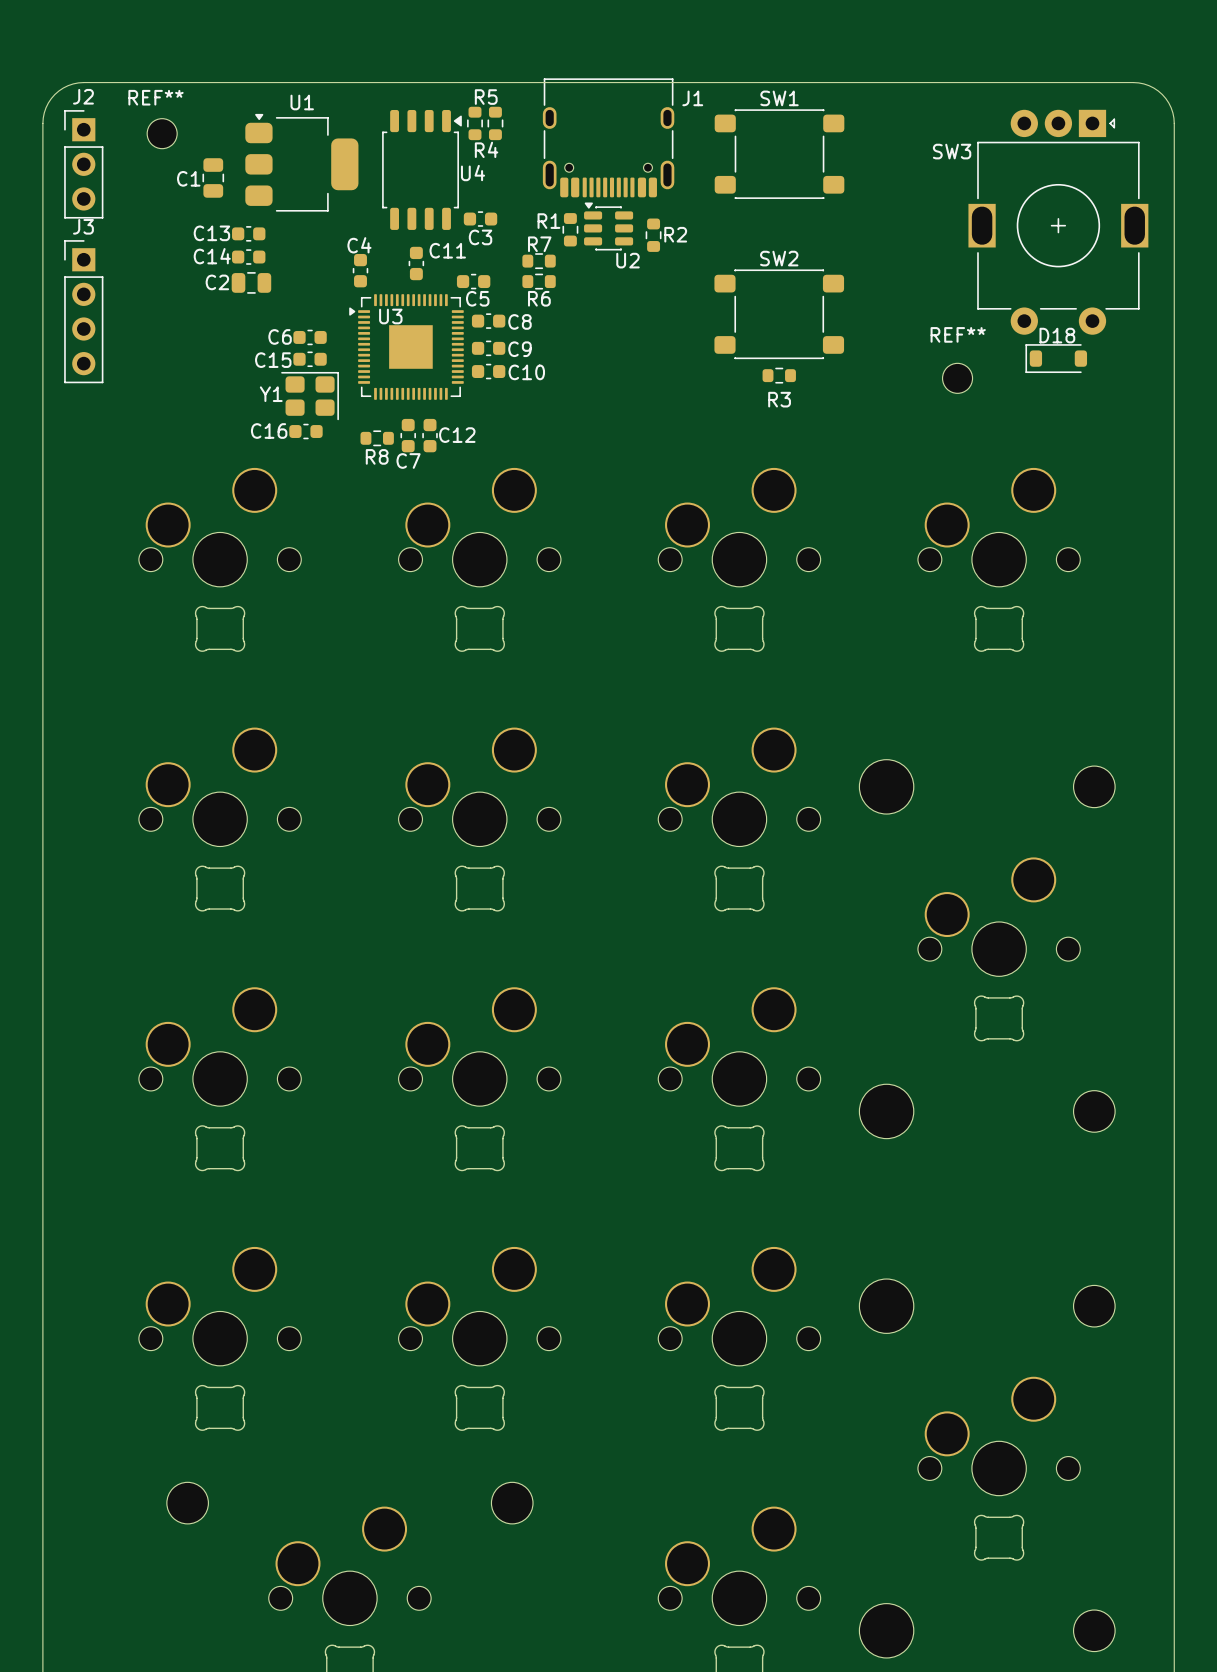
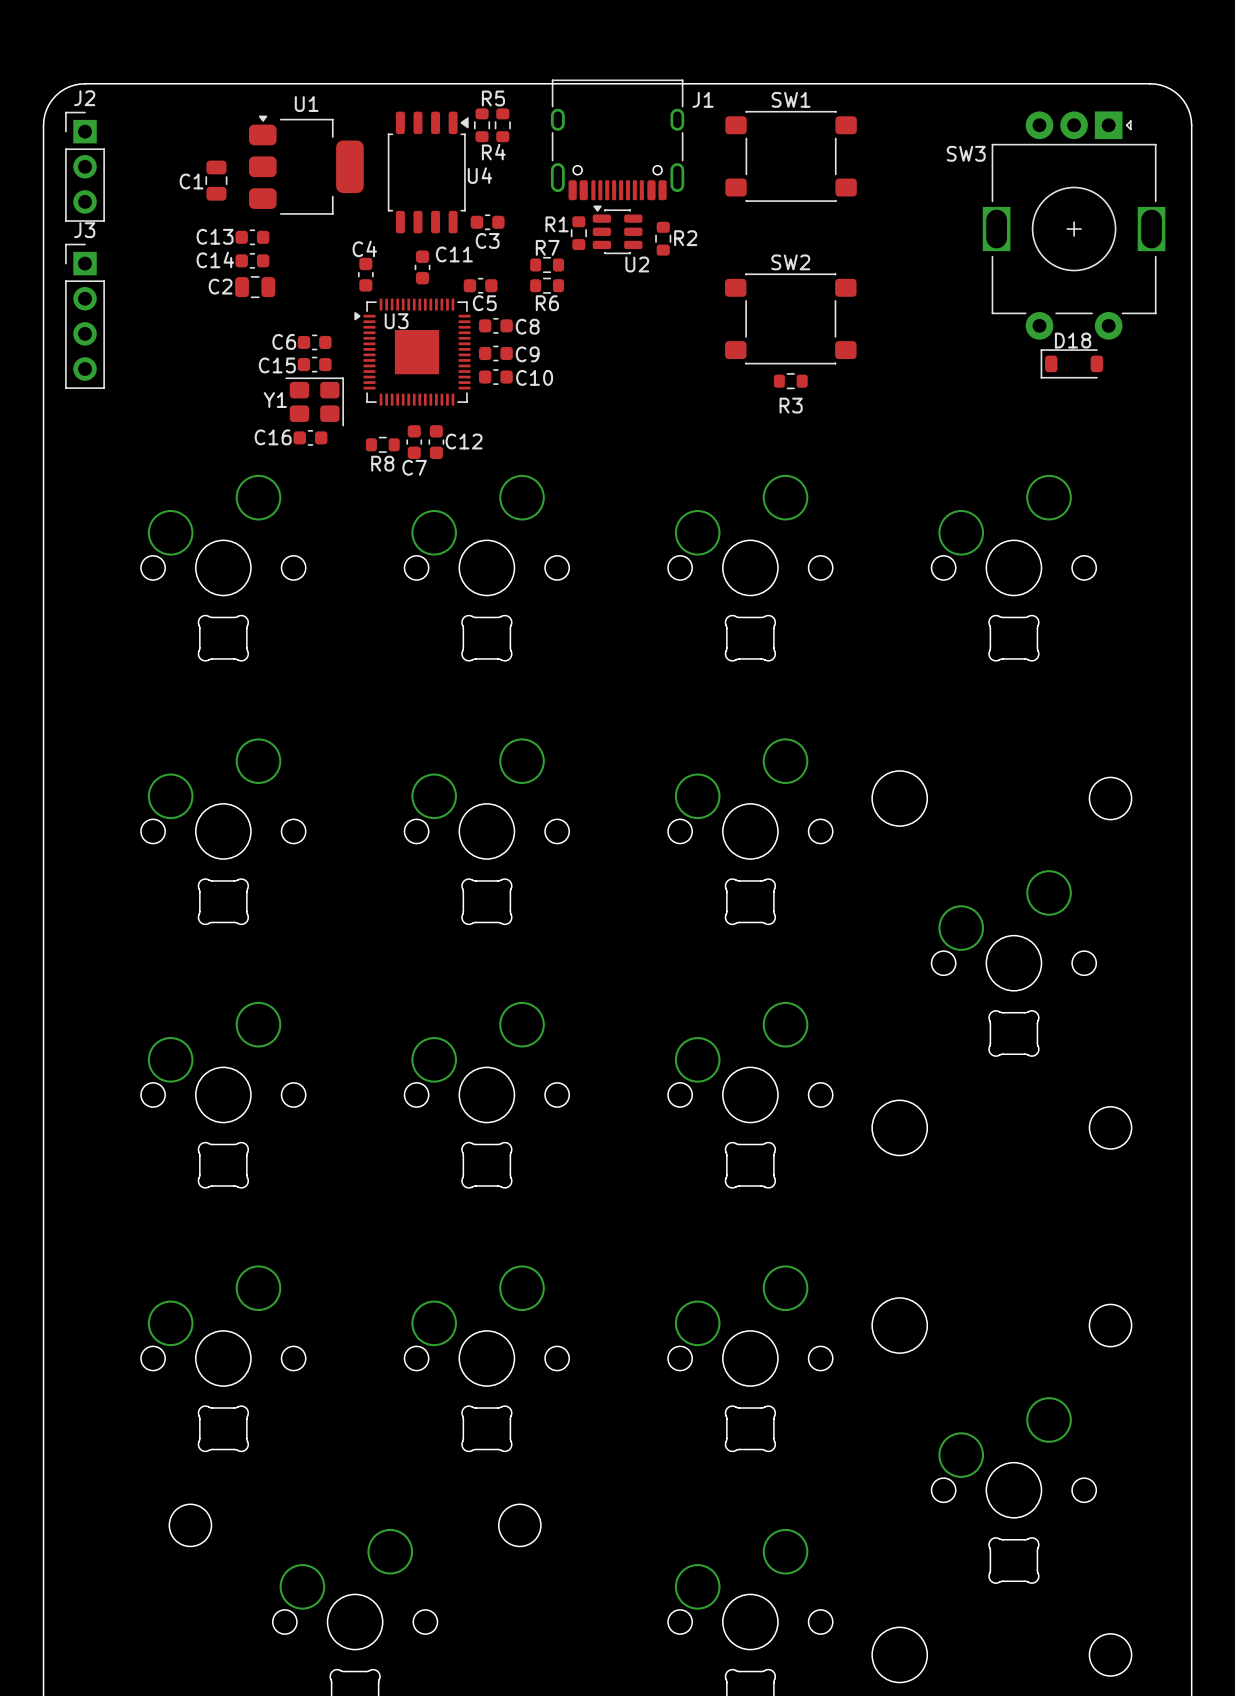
REF**: (162, 133) -> none
REF**: (957, 378) -> none

